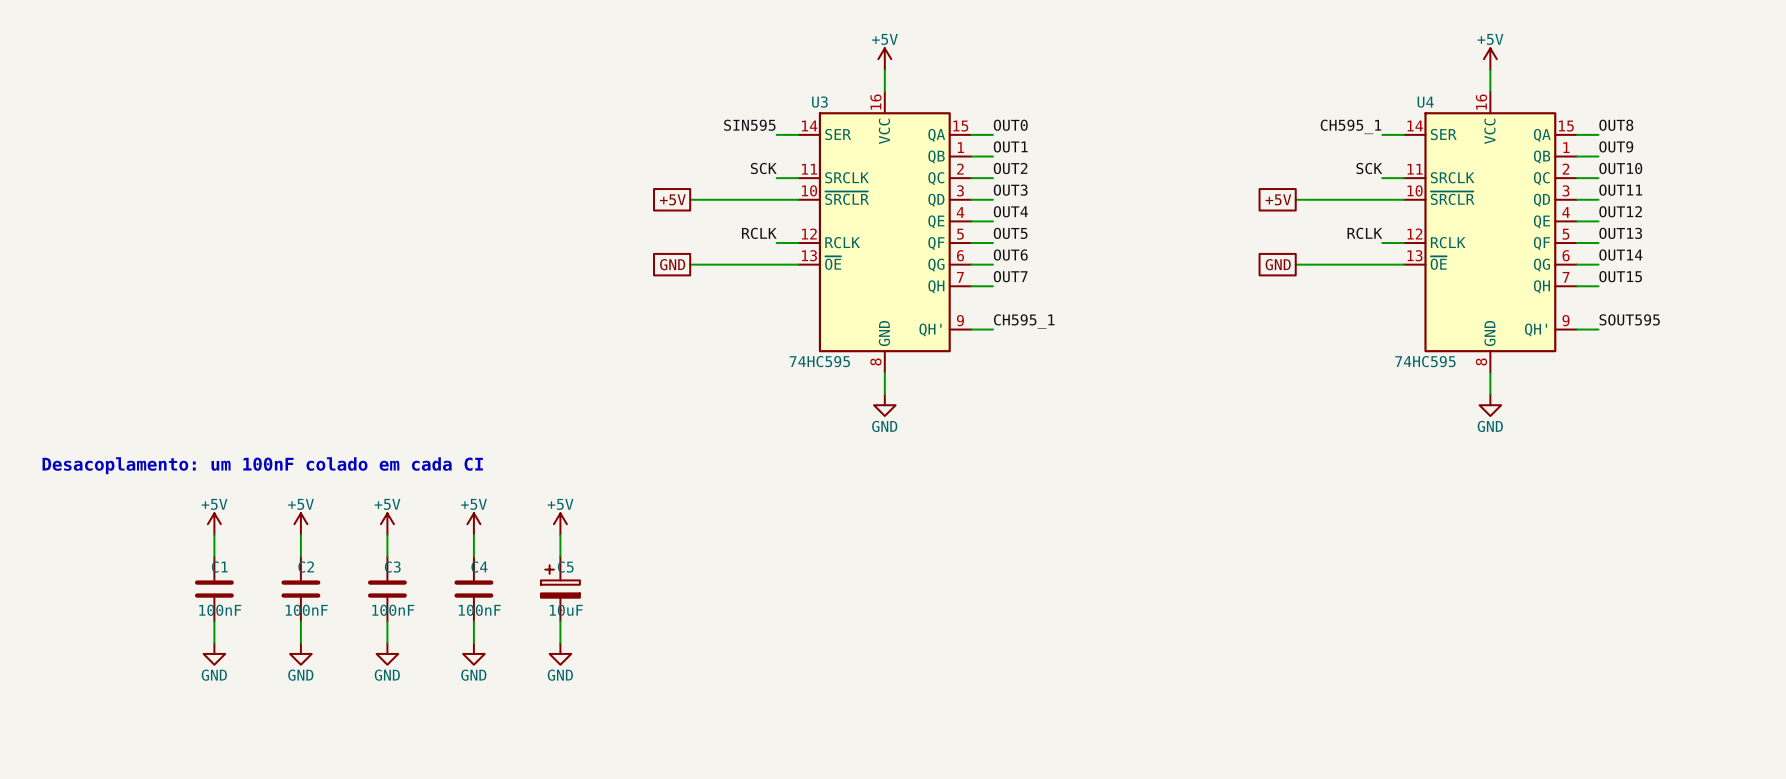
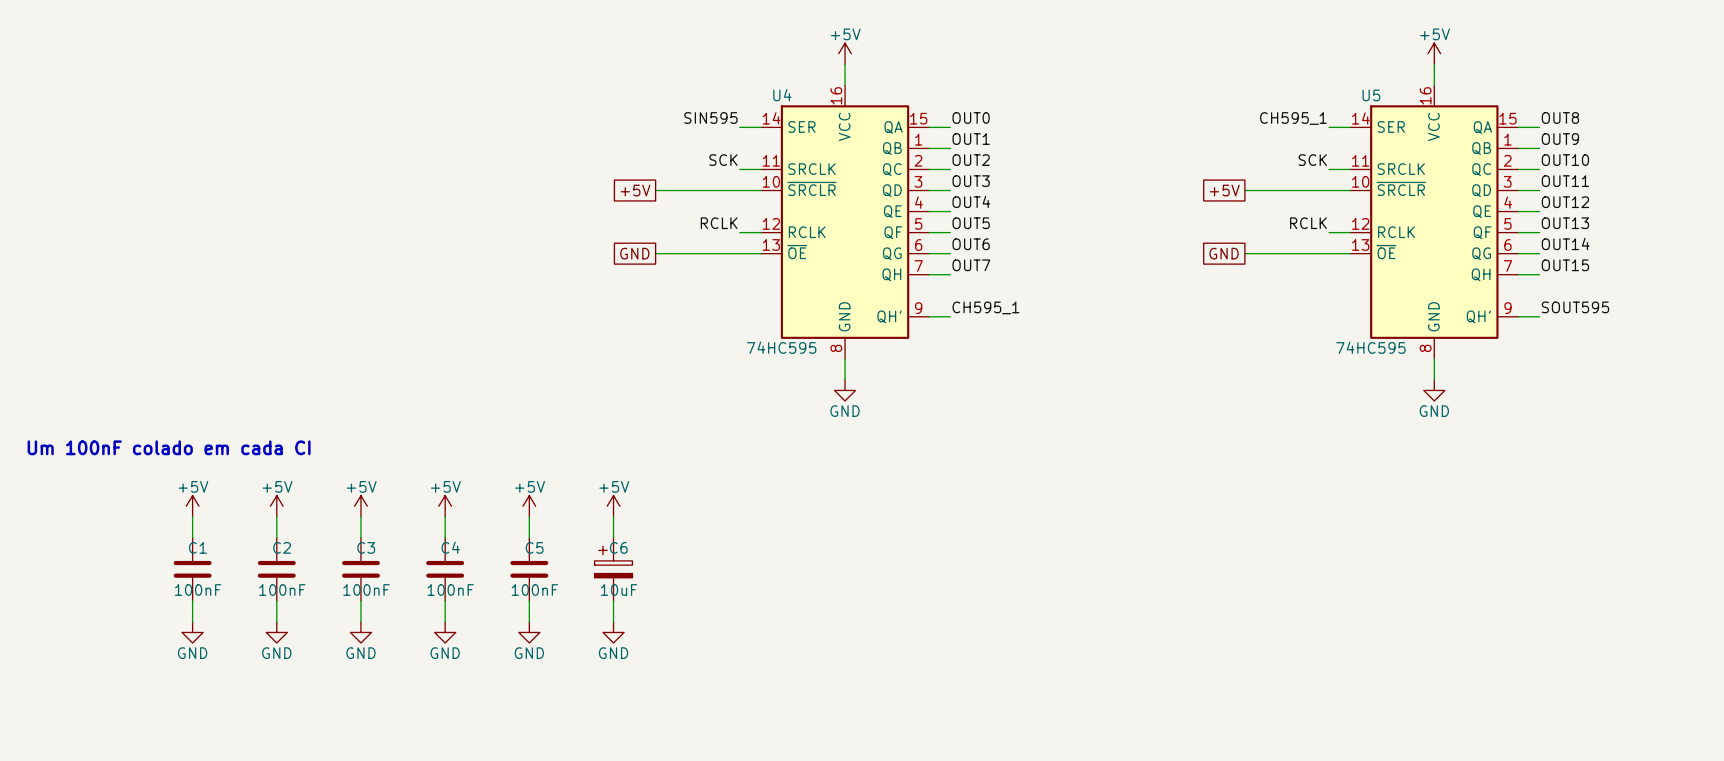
U3 name: U3 (819, 102) -> U4 (782, 95)
U4 name: U4 (1425, 102) -> U5 (1371, 95)
text: Desacoplamento: um 100nF colado em cada CI (262, 465) -> Um 100nF colado em cada CI (169, 447)
power symbol: none -> +5V (613, 506)
wire: none -> (613, 516) (613, 537)
C5 symbol: [540, 556, 580, 622] -> [510, 537, 549, 601]
C6: none -> 10uF (613, 569)
C5 value: 10uF (566, 610) -> 100nF (534, 589)
wire: none -> (613, 600) (613, 621)
power symbol: none -> GND (613, 632)

